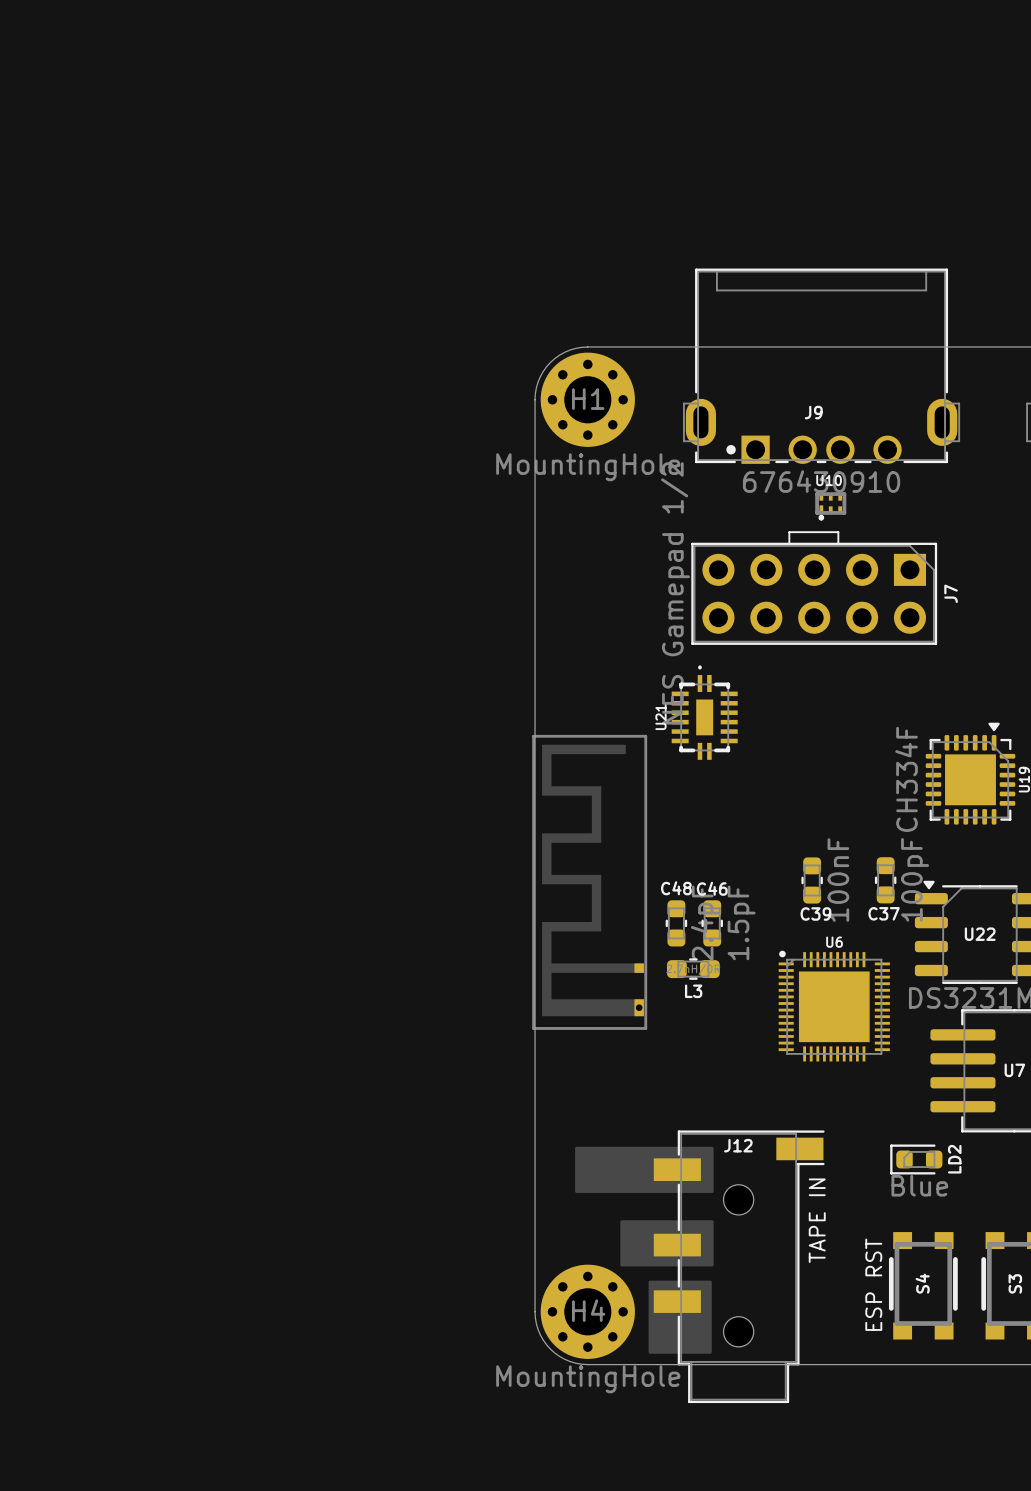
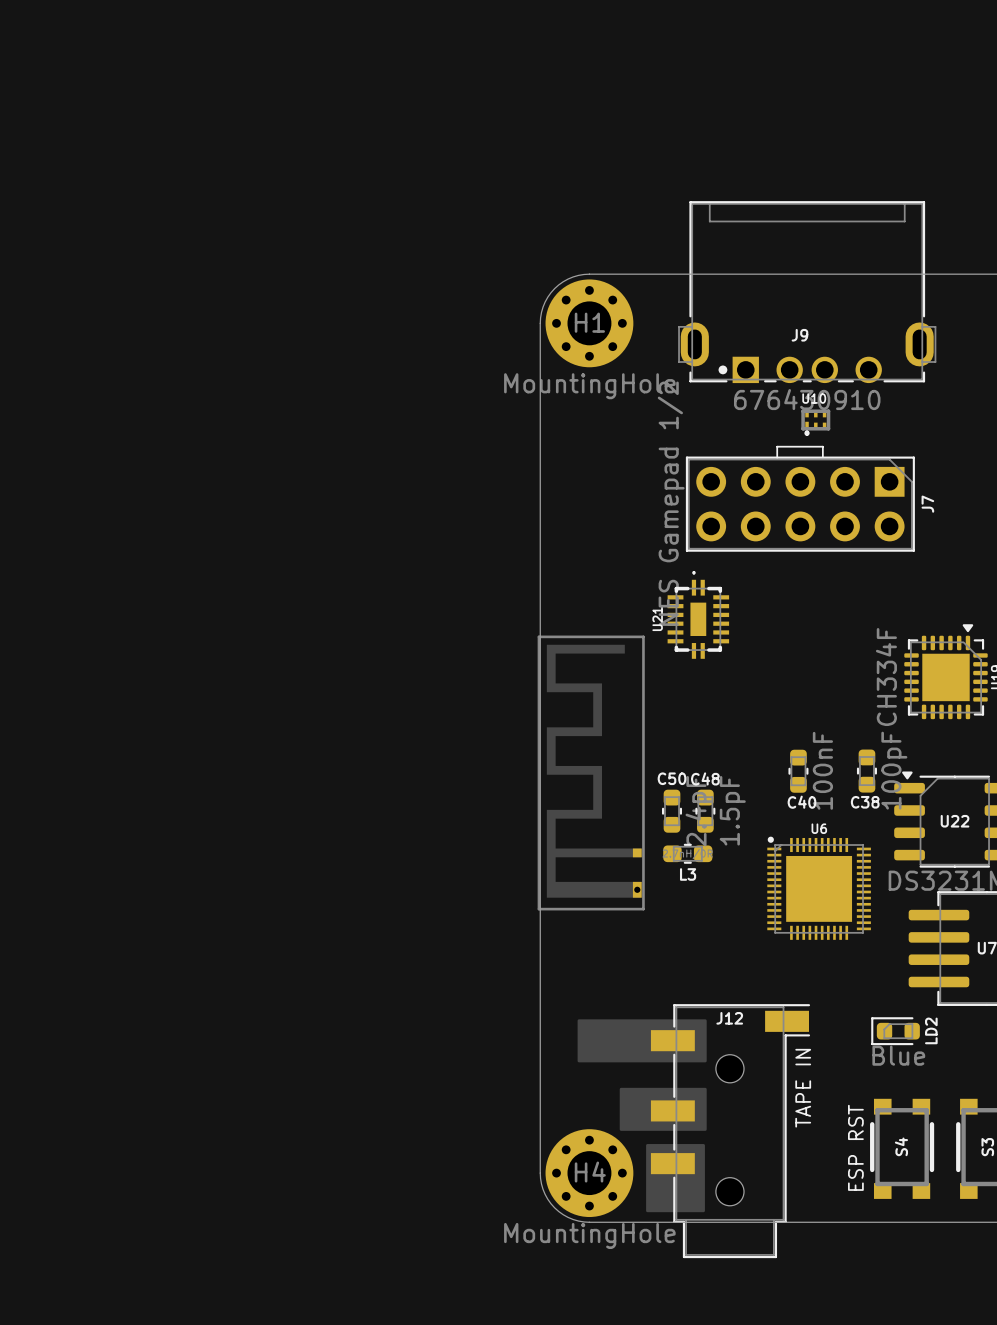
C48 name: C48 (676, 888) -> C50 (672, 778)
C46 name: C46 (712, 888) -> C48 (705, 778)
C37 name: C37 (884, 913) -> C38 (865, 802)
C39 name: C39 (815, 914) -> C40 (801, 802)

